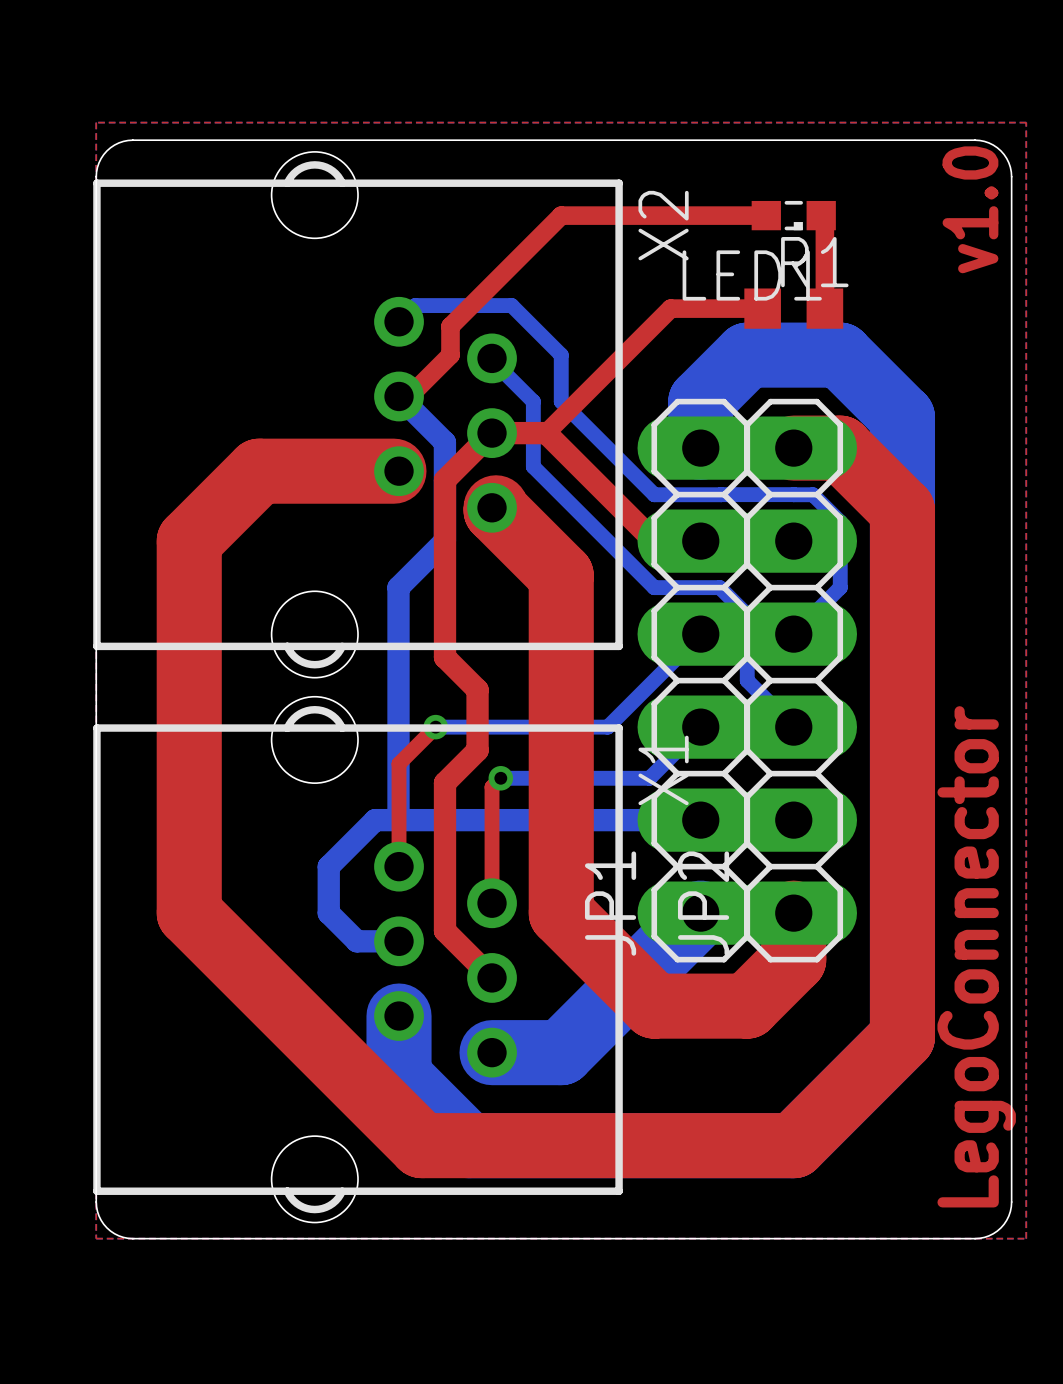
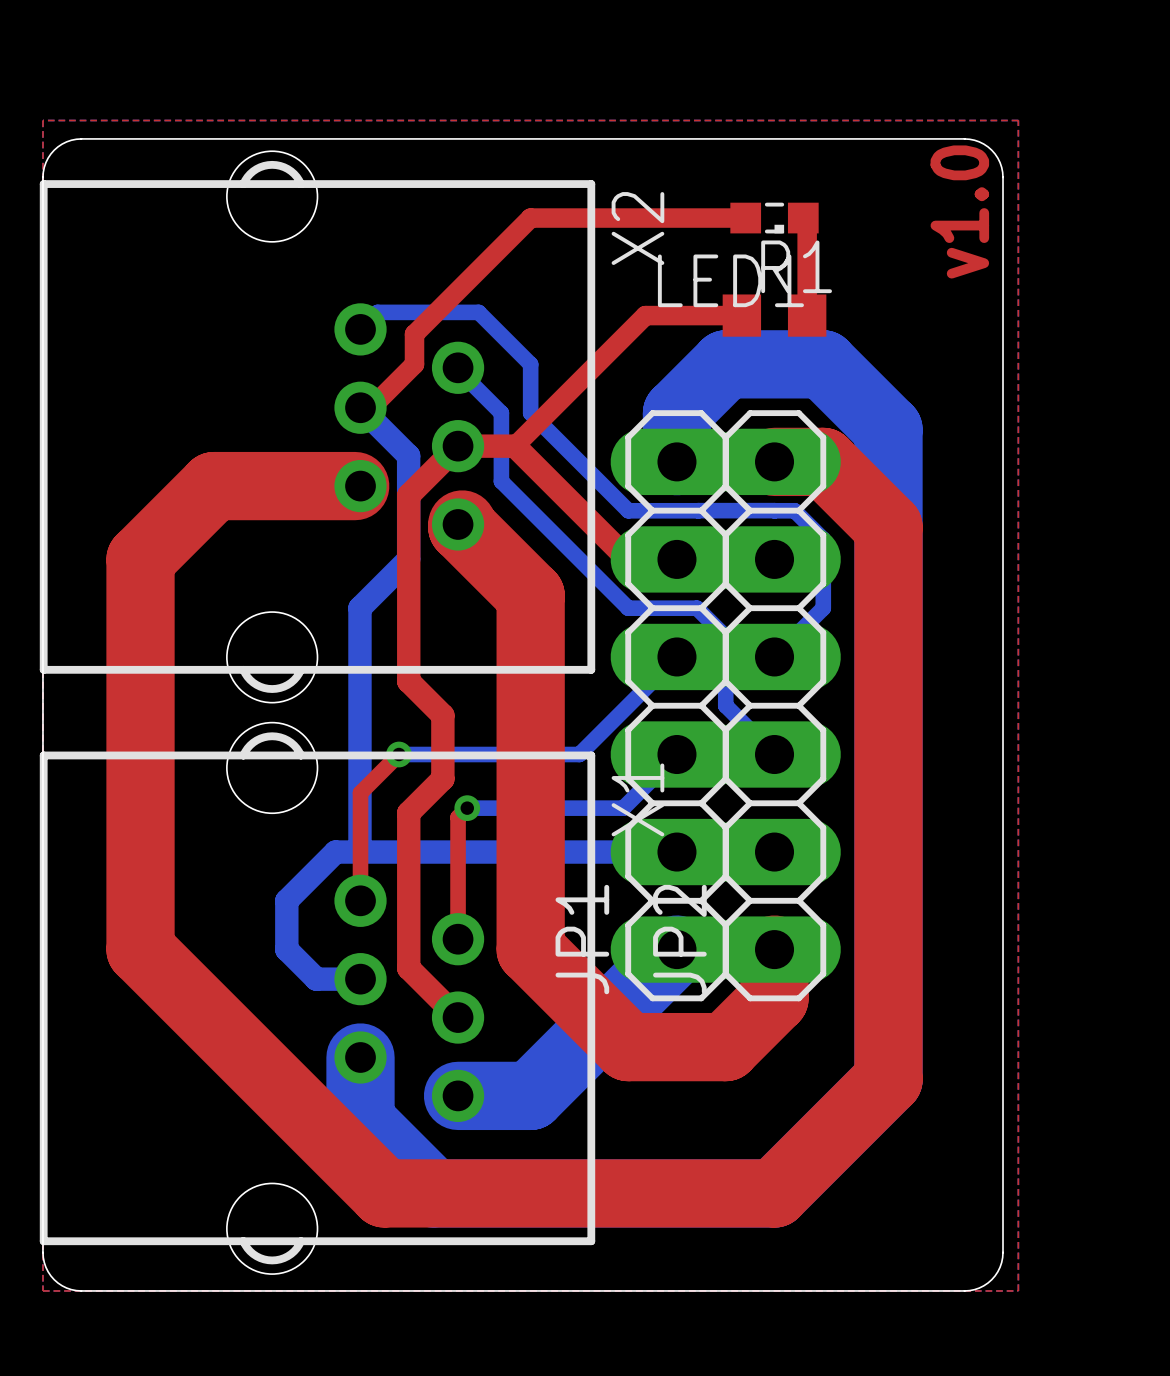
text: LegoConnector (976, 956) -> none

